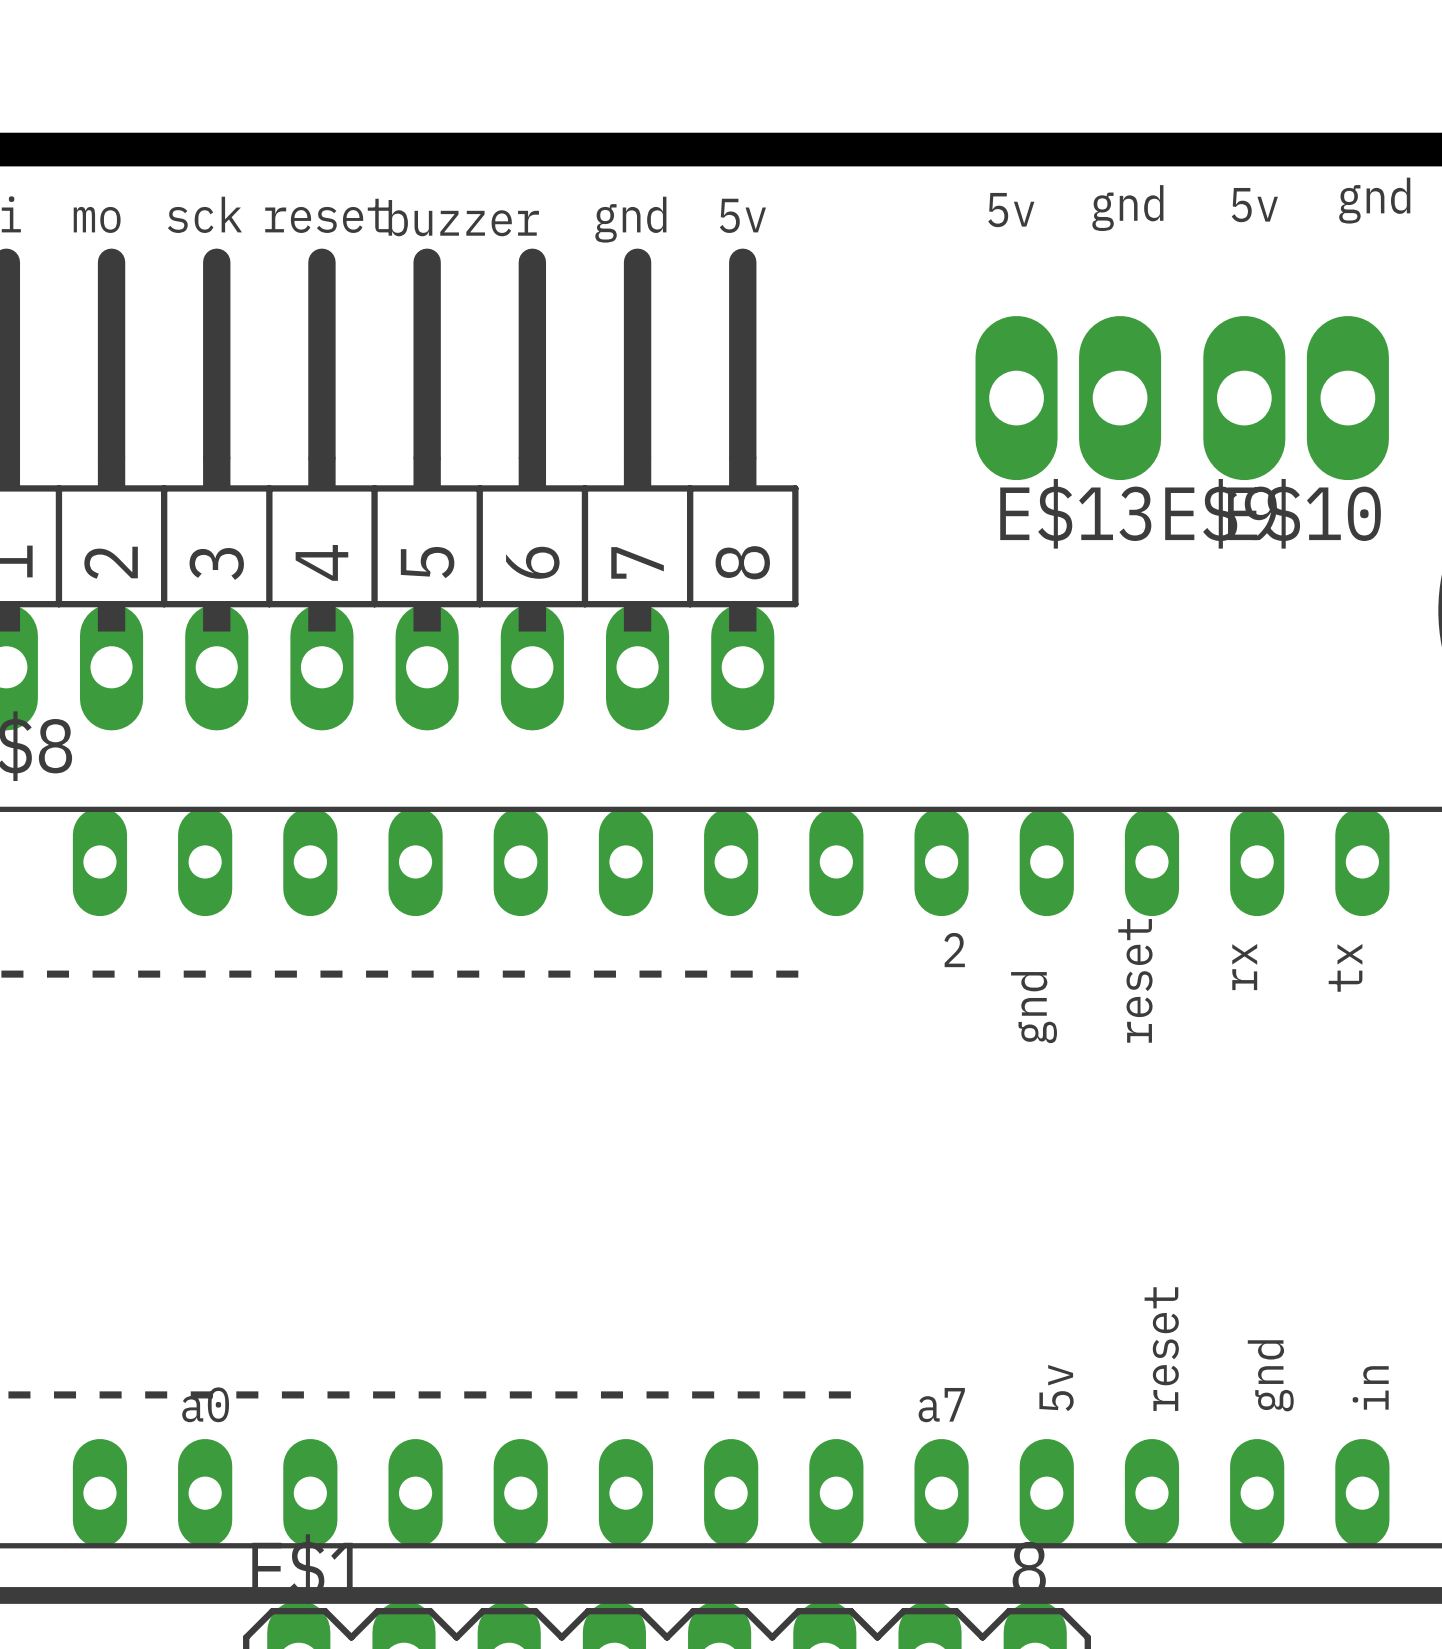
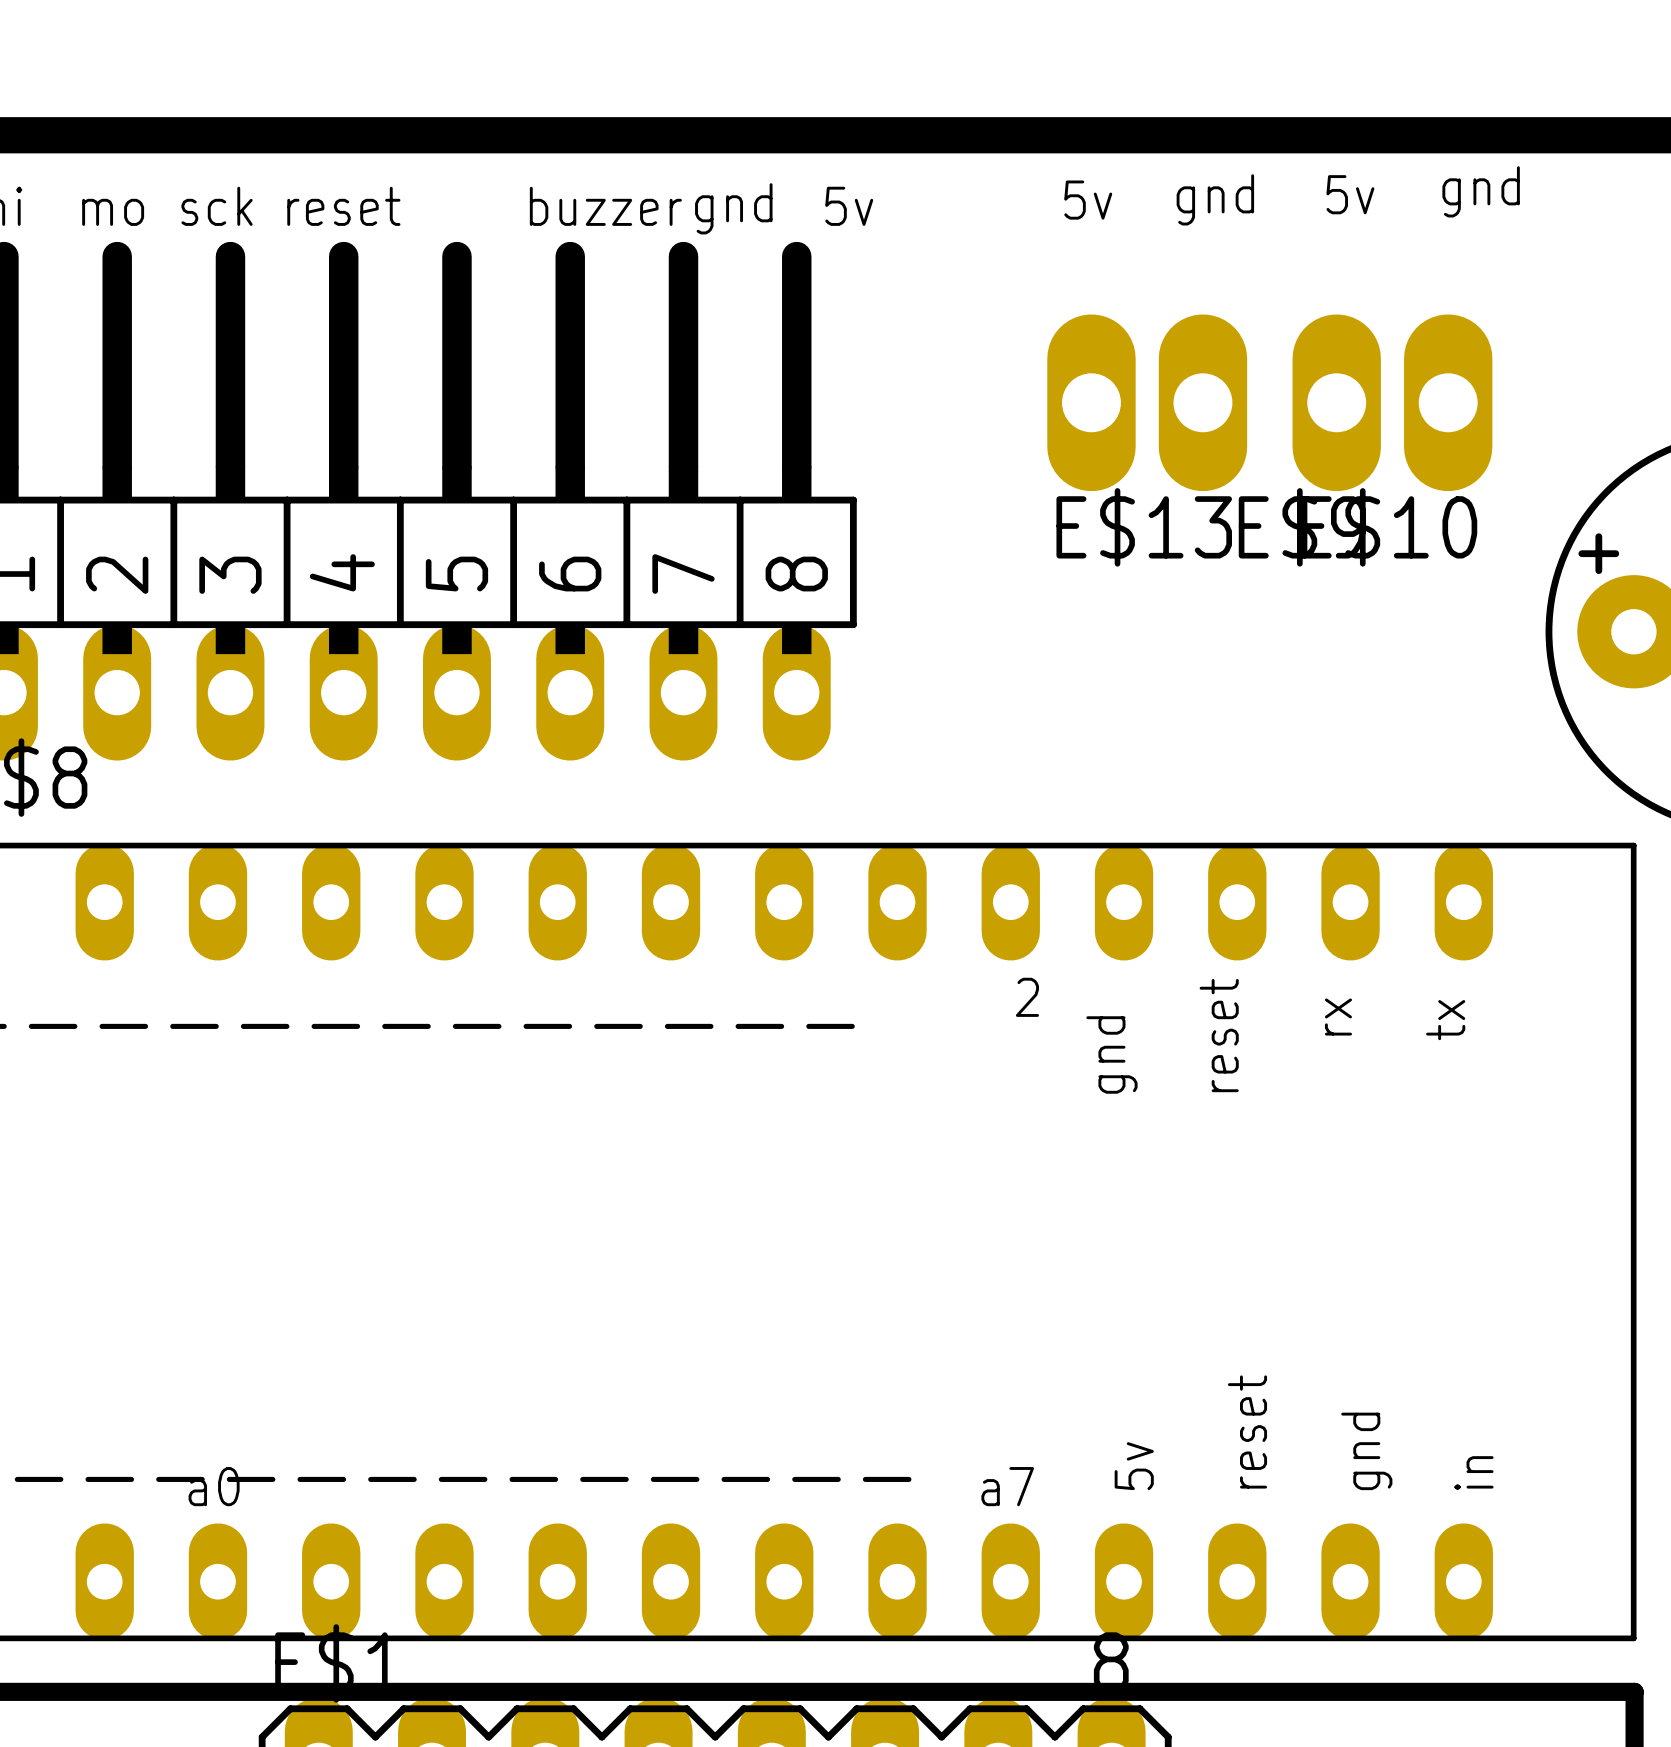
text position: 5v (742, 215) -> 5v (849, 206)
text position: buzzer (463, 218) -> buzzer (605, 206)
text position: gnd (630, 219) -> gnd (733, 208)

